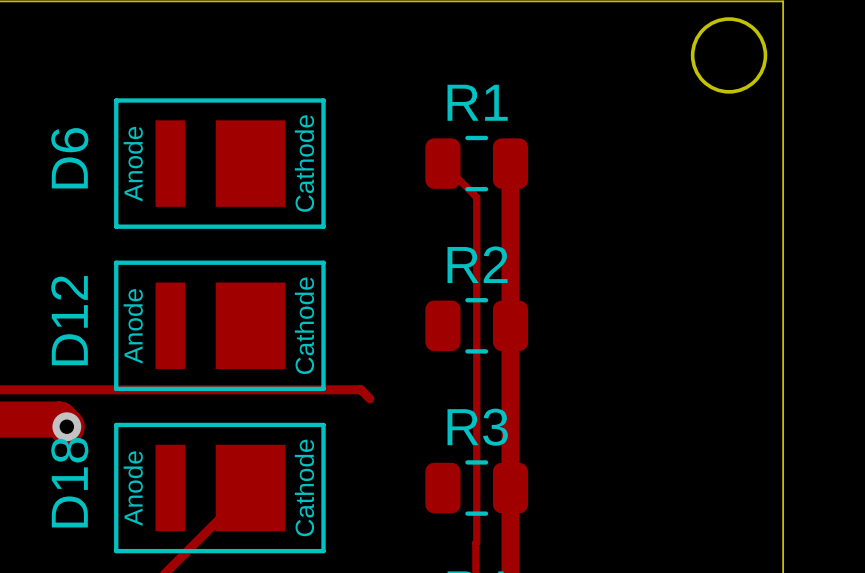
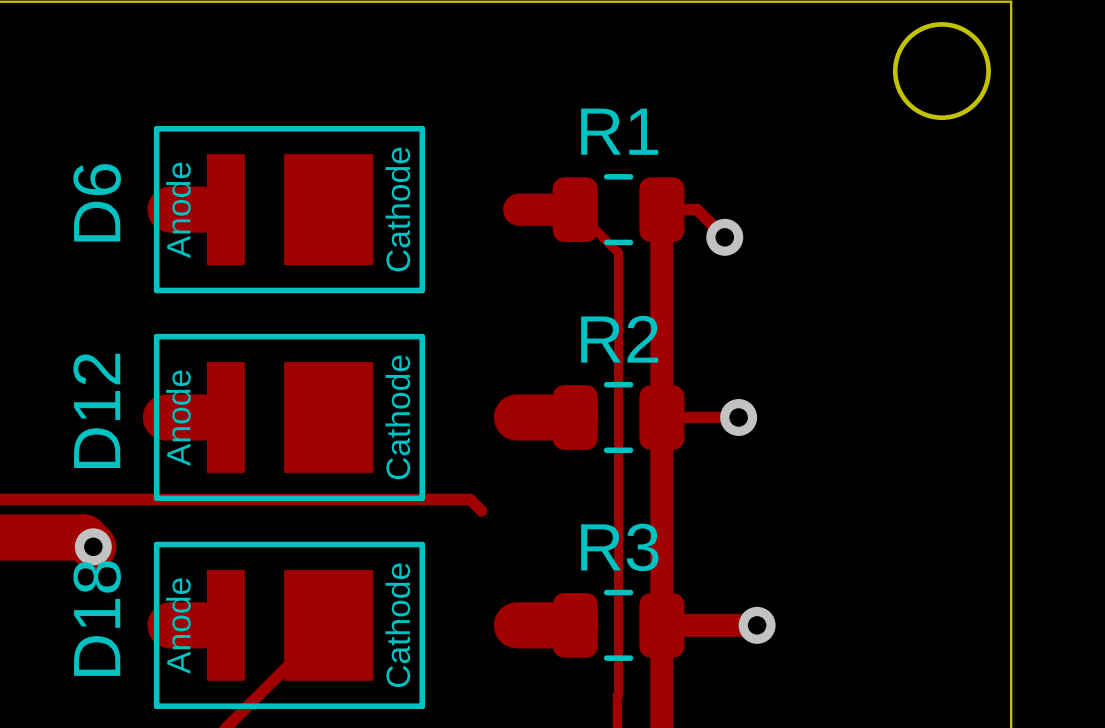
track: none -> (170, 209) (202, 209)
track: none -> (519, 209) (575, 209)
track: none -> (661, 209) (697, 209) (724, 237)
via: none -> (724, 237)
track: none -> (165, 417) (202, 417)
track: none -> (516, 417) (575, 417)
track: none -> (661, 417) (738, 417)
via: none -> (738, 417)
track: none -> (170, 625) (202, 625)
track: none -> (516, 625) (575, 625)
track: none -> (661, 625) (757, 625)
via: none -> (757, 625)

